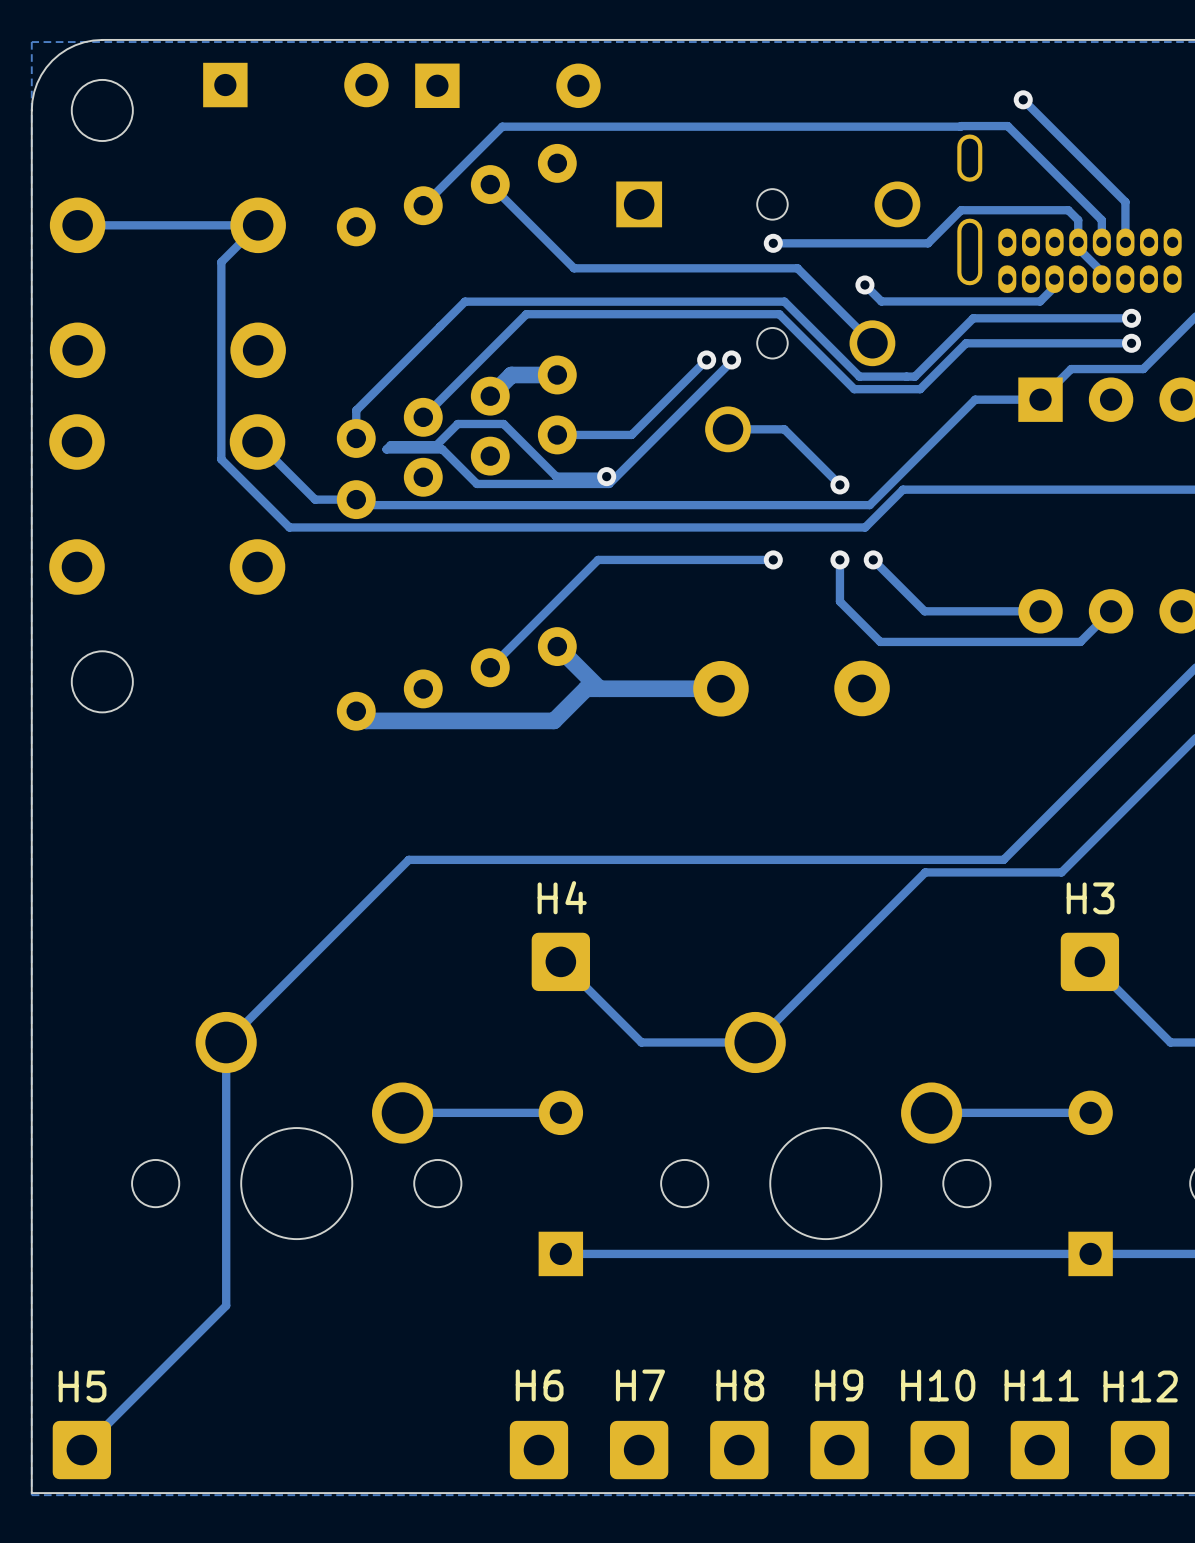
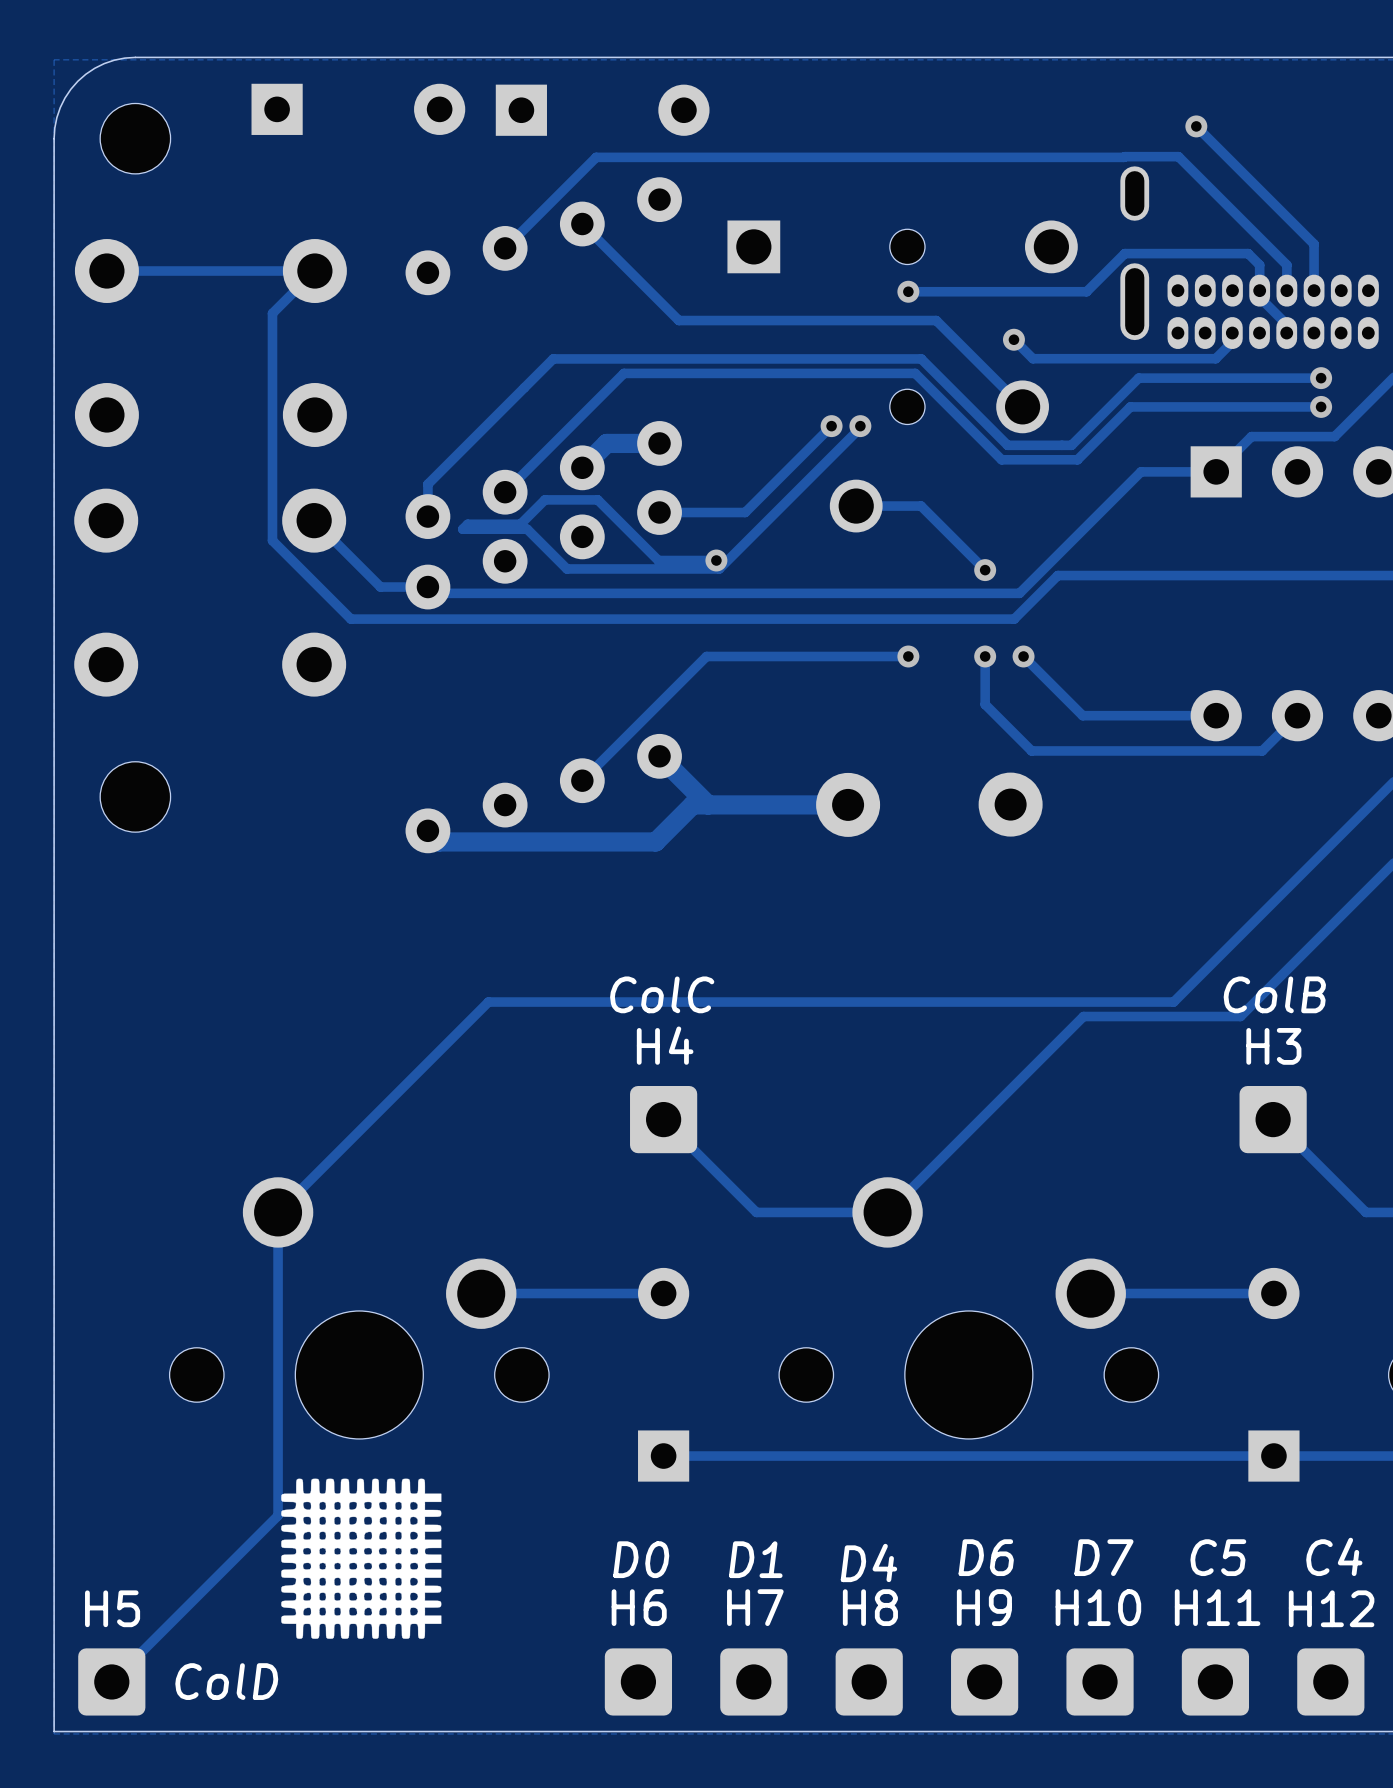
text: none -> ColC (662, 994)
text: none -> ColB (1274, 994)
drawing: none -> [281, 1478, 442, 1639]
text: none -> C4 (1334, 1556)
text: none -> D6 (986, 1557)
text: none -> D7 (1103, 1557)
text: none -> C5 (1218, 1557)
text: none -> D0 (641, 1559)
text: none -> D1 (755, 1559)
text: none -> D4 (868, 1562)
text: none -> ColD (226, 1681)

